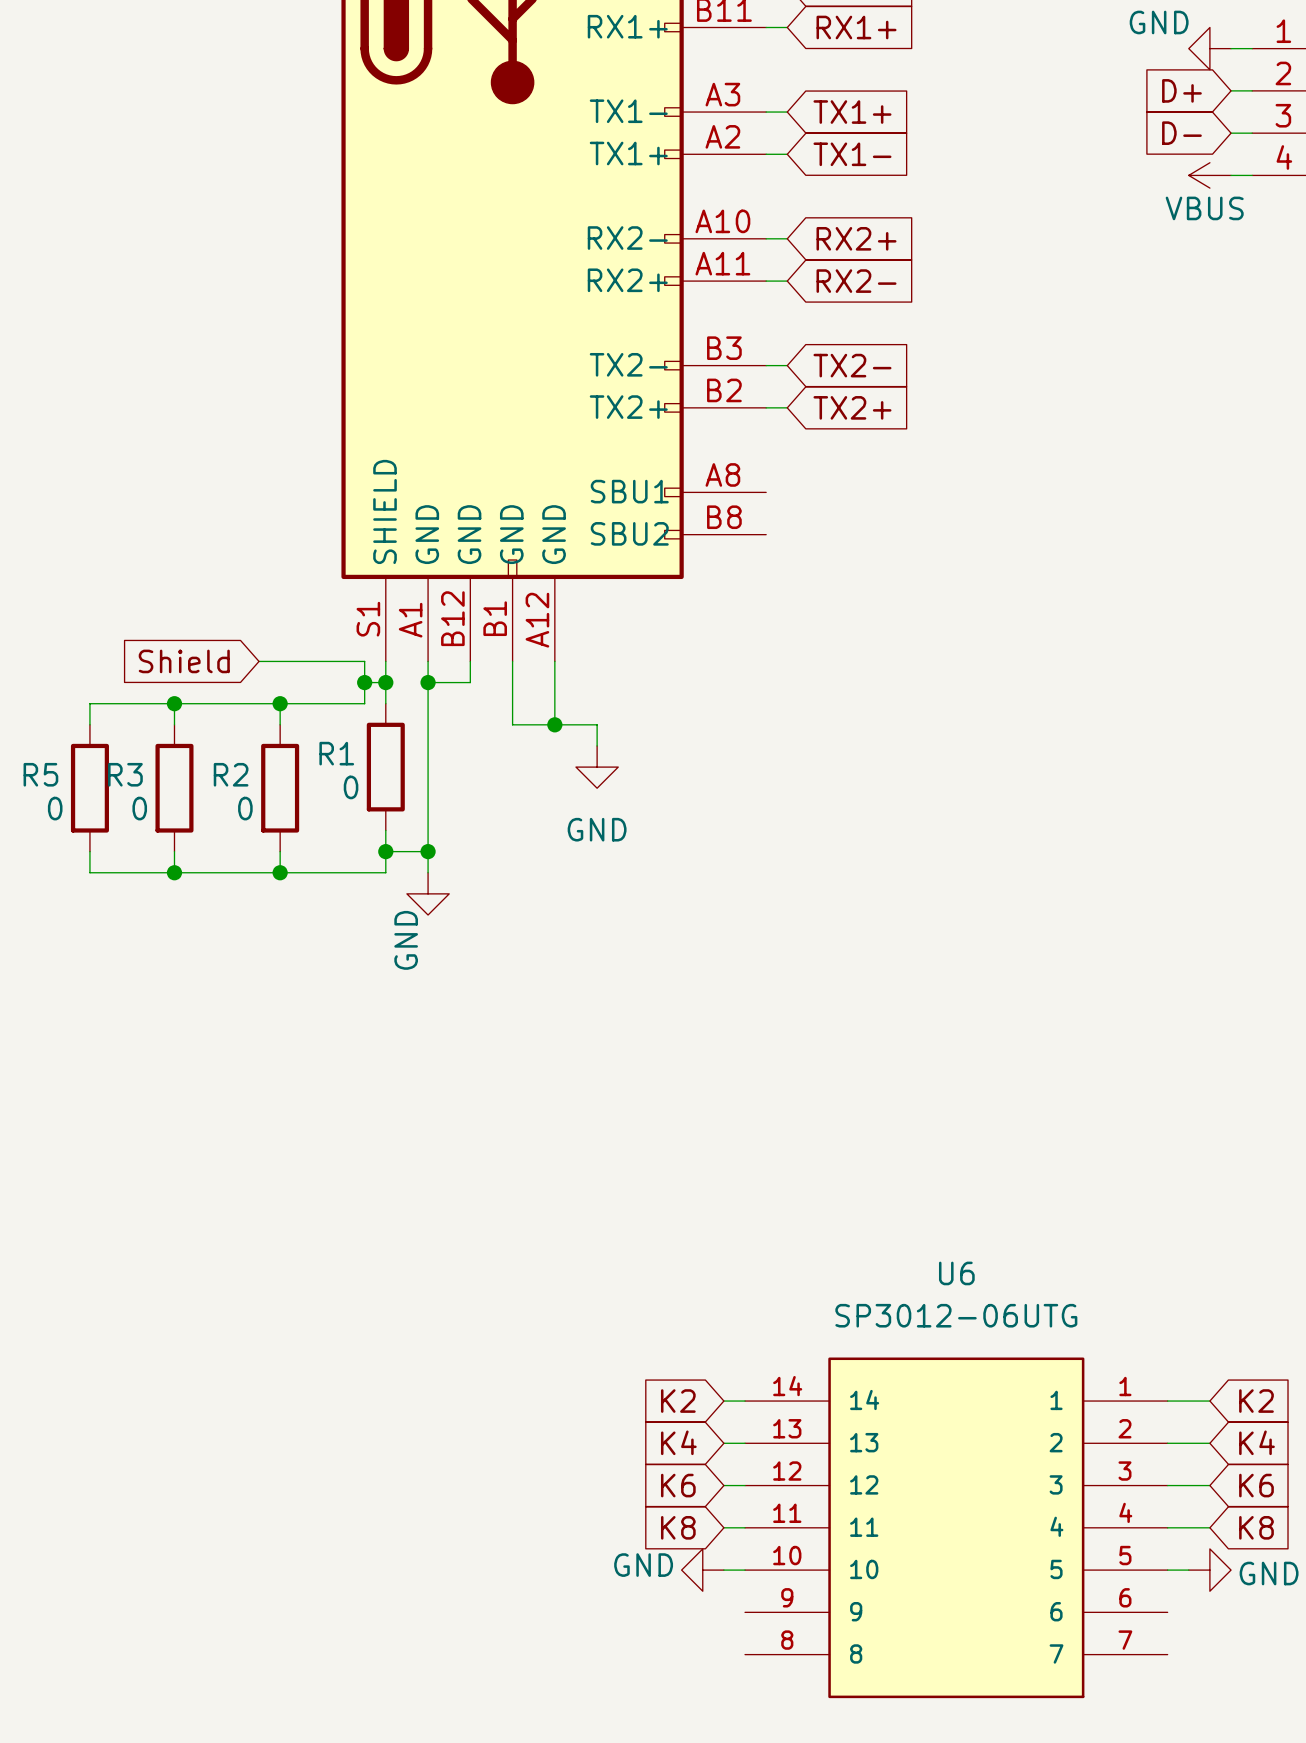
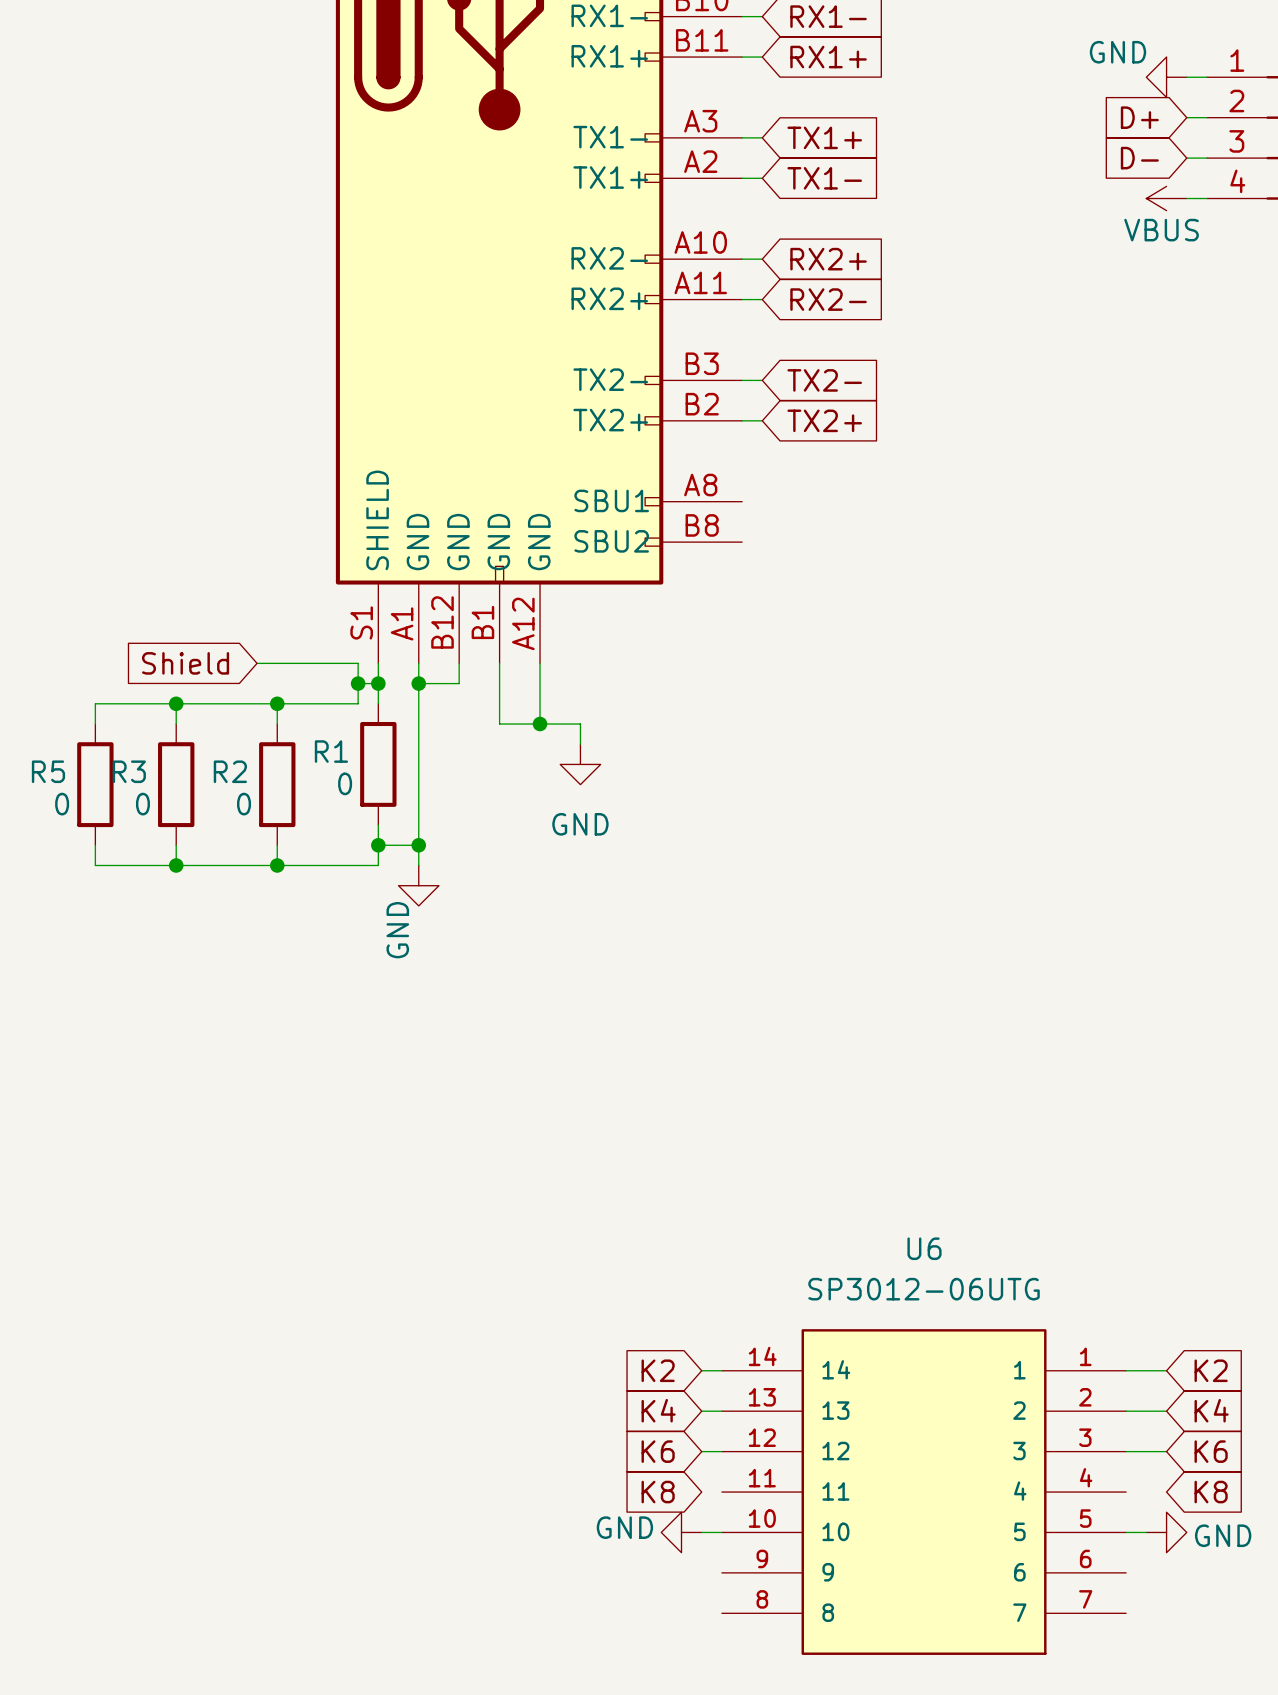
wire: (723, 1527) (745, 1527) -> none
wire: (1167, 1527) (1209, 1527) -> none

